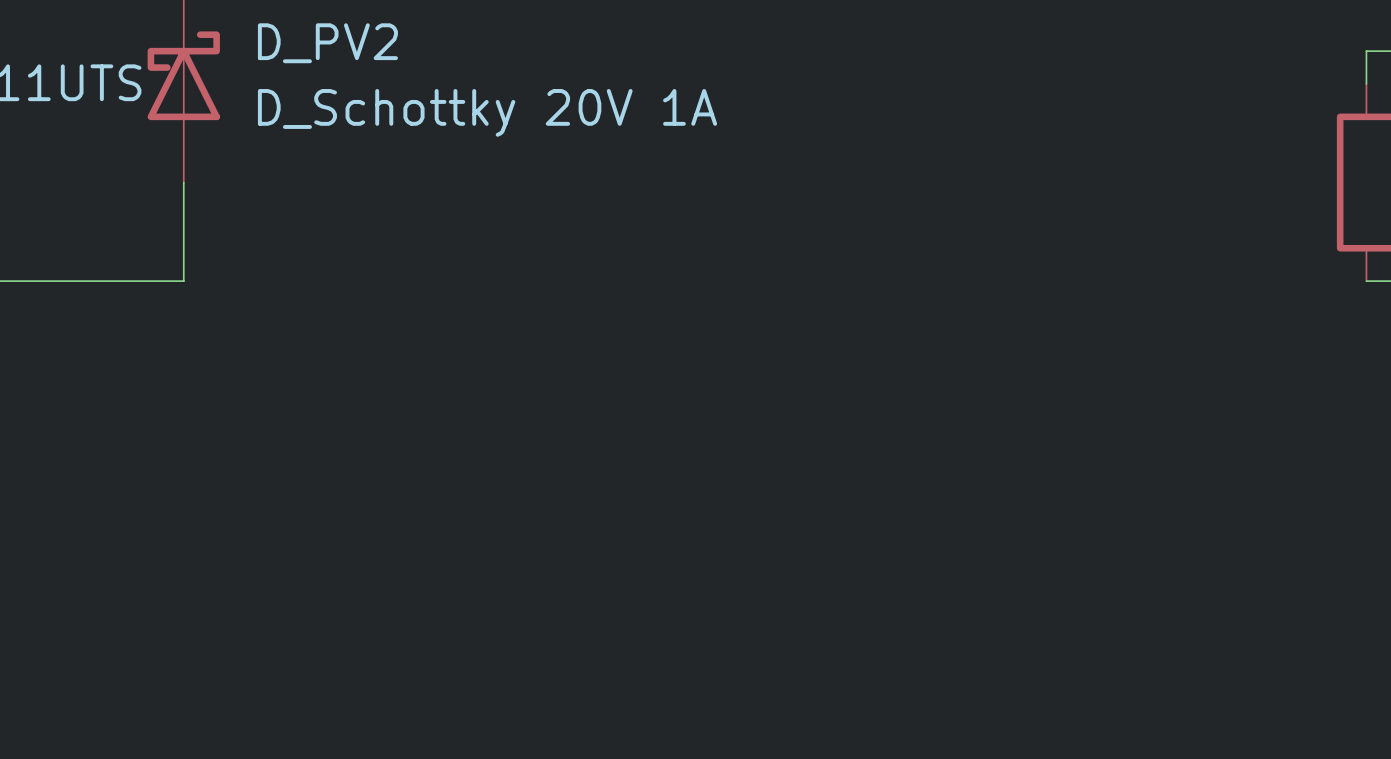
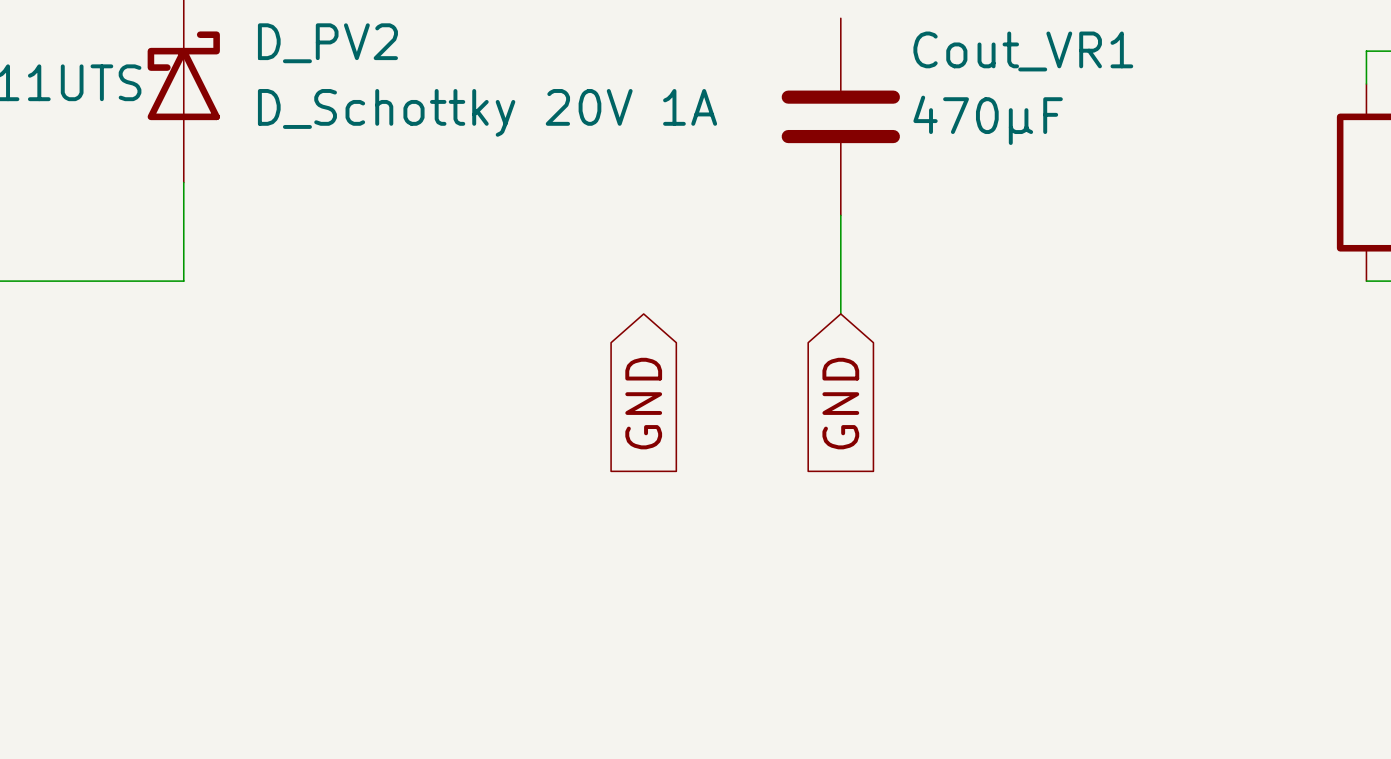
Cout_VR1: none -> 470µF (840, 116)
wire: none -> (840, 215) (840, 313)
global label: none -> GND (643, 403)
global label: none -> GND (840, 403)

